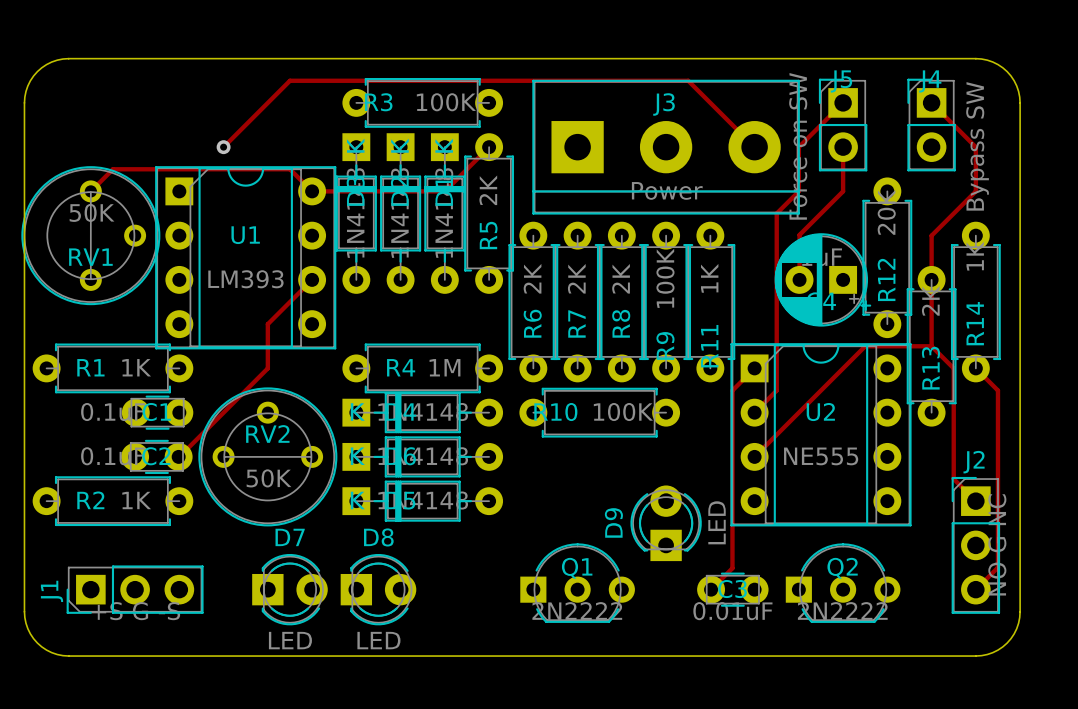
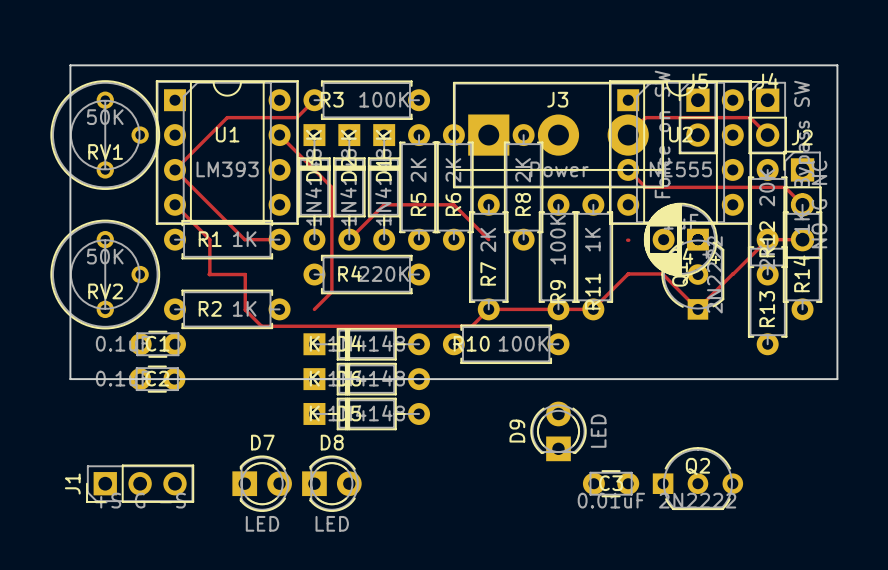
board edge: (68, 58) (51, 62) (37, 71) (27, 85) (24, 102) (24, 611) (25, 623) (33, 638) (41, 646) (51, 652) (68, 656) (987, 654) (1002, 646) (1010, 638) (1016, 628) (1019, 617) (1020, 456) -> (87, 65) (70, 65) (70, 379) (837, 379)
board edge: (975, 58) (992, 62) (1007, 71) (1016, 85) (1020, 102) -> (802, 65) (837, 65) (837, 100)
track: (843, 102) (798, 147) (798, 191) (776, 213) (776, 390) (754, 412) -> none
track: (931, 102) (975, 147) (975, 191) (931, 235) (931, 346) -> none
track: (245, 125) (289, 80) (688, 80) (754, 147) -> (227, 117) (297, 117) (314, 100)
via: (223, 147) -> none
track: none -> (279, 135) (331, 187) (331, 291) (314, 309)
track: (489, 147) (444, 191) (312, 191) (289, 169) (112, 169) (90, 191) -> none
track: none -> (628, 135) (645, 117) (750, 117) (767, 135)
track: (843, 147) (843, 191) (799, 234) (798, 279) -> none
track: none -> (628, 169) (645, 187) (785, 187) (802, 204)
RV1 position: (90, 235) -> (105, 135)
track: none -> (175, 204) (209, 239)
U1 position: (245, 257) -> (227, 152)
R12 position: (887, 257) -> (767, 222)
track: (312, 279) (267, 324) (267, 368) (178, 456) -> (279, 239) (244, 239) (175, 169) (209, 135)
track: none -> (349, 239) (384, 204) (453, 204) (488, 239)
track: none -> (802, 239) (767, 239) (697, 309) (662, 273) (628, 273)
track: none -> (209, 240) (209, 274)
track: none -> (627, 240) (628, 240)
R6 position: (533, 302) -> (453, 187)
R8 position: (621, 302) -> (523, 187)
track: none -> (209, 273) (245, 274) (245, 309) (261, 326) (471, 326) (488, 309) (592, 309) (628, 273)
track: (931, 346) (865, 346) (754, 456) -> none
track: (931, 346) (953, 368) (953, 479) (975, 501) -> none
R4 value: 1M (445, 367) -> 220K (383, 274)
R1 position: (112, 368) -> (227, 239)
R4 position: (422, 368) -> (366, 274)
track: (754, 368) (732, 390) (732, 568) (711, 589) -> none
track: (975, 368) (997, 390) (997, 567) (975, 589) -> none
U2 position: (820, 434) -> (680, 152)
RV2 rotation: 0° (267, 456) -> 90° clockwise (105, 274)
RV2 position: (267, 456) -> (105, 274)
R2 position: (112, 501) -> (227, 309)
J2 position: (975, 545) -> (802, 204)
Q1 rotation: 0° (577, 583) -> 90° counterclockwise (692, 274)
Q1 position: (577, 583) -> (692, 274)

